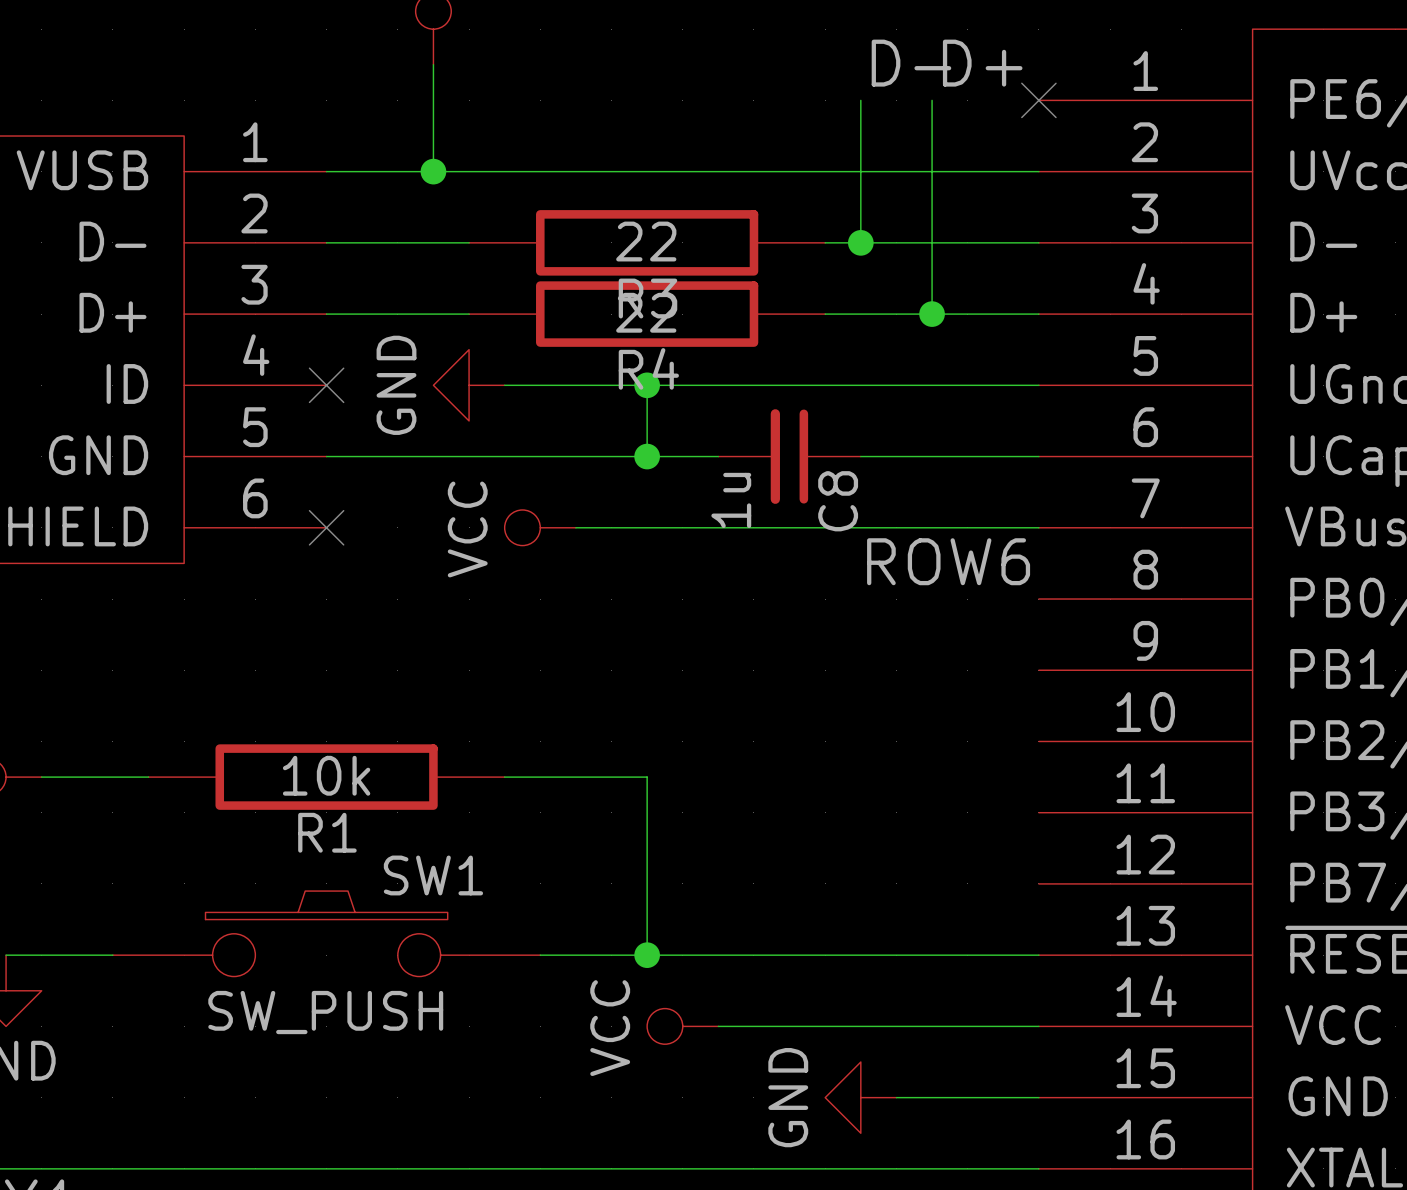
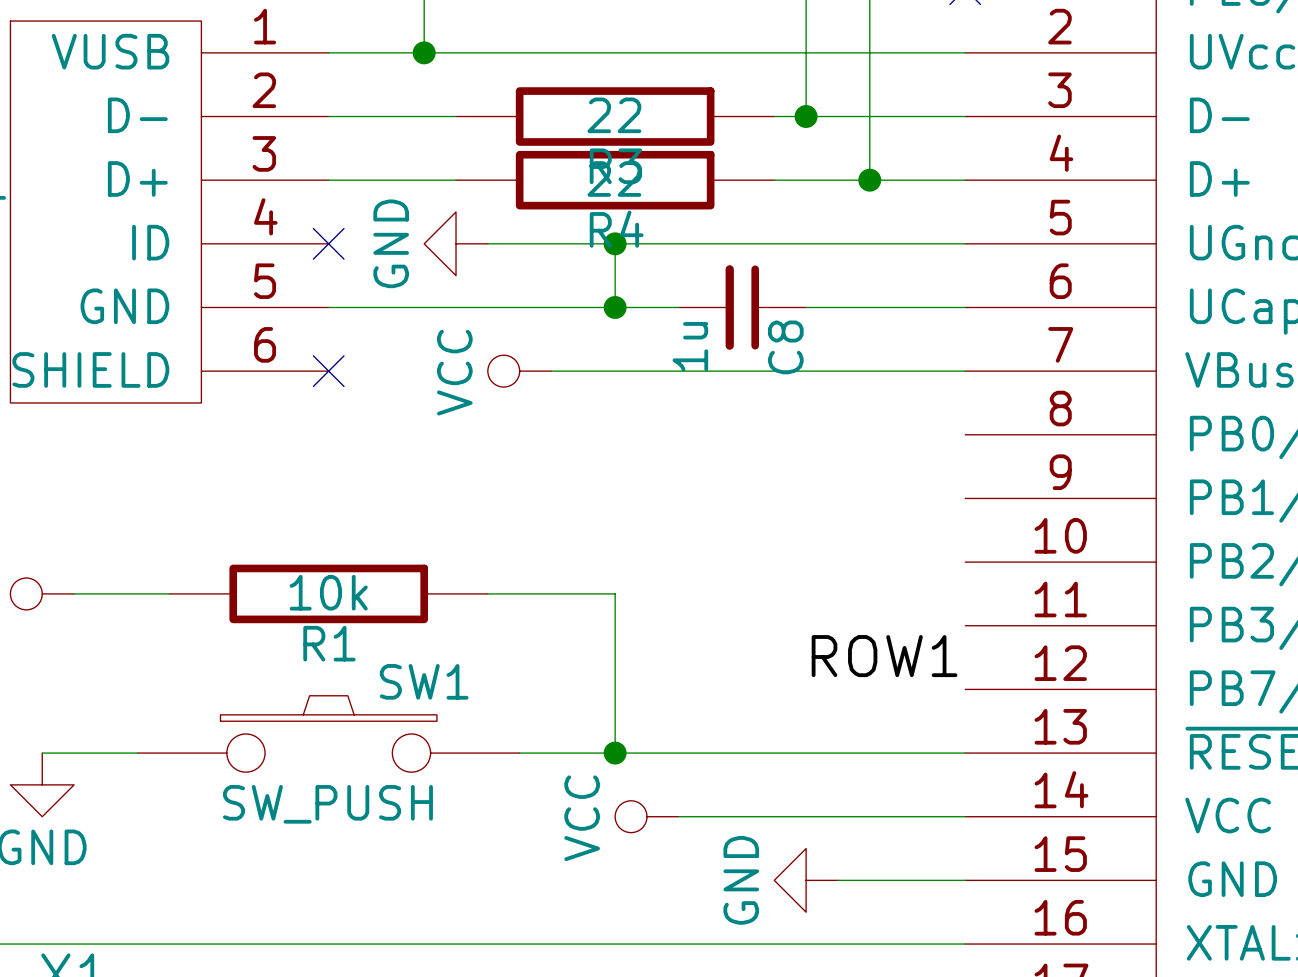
label: ROW6 (948, 561) -> none
label: none -> ROW1 (884, 656)

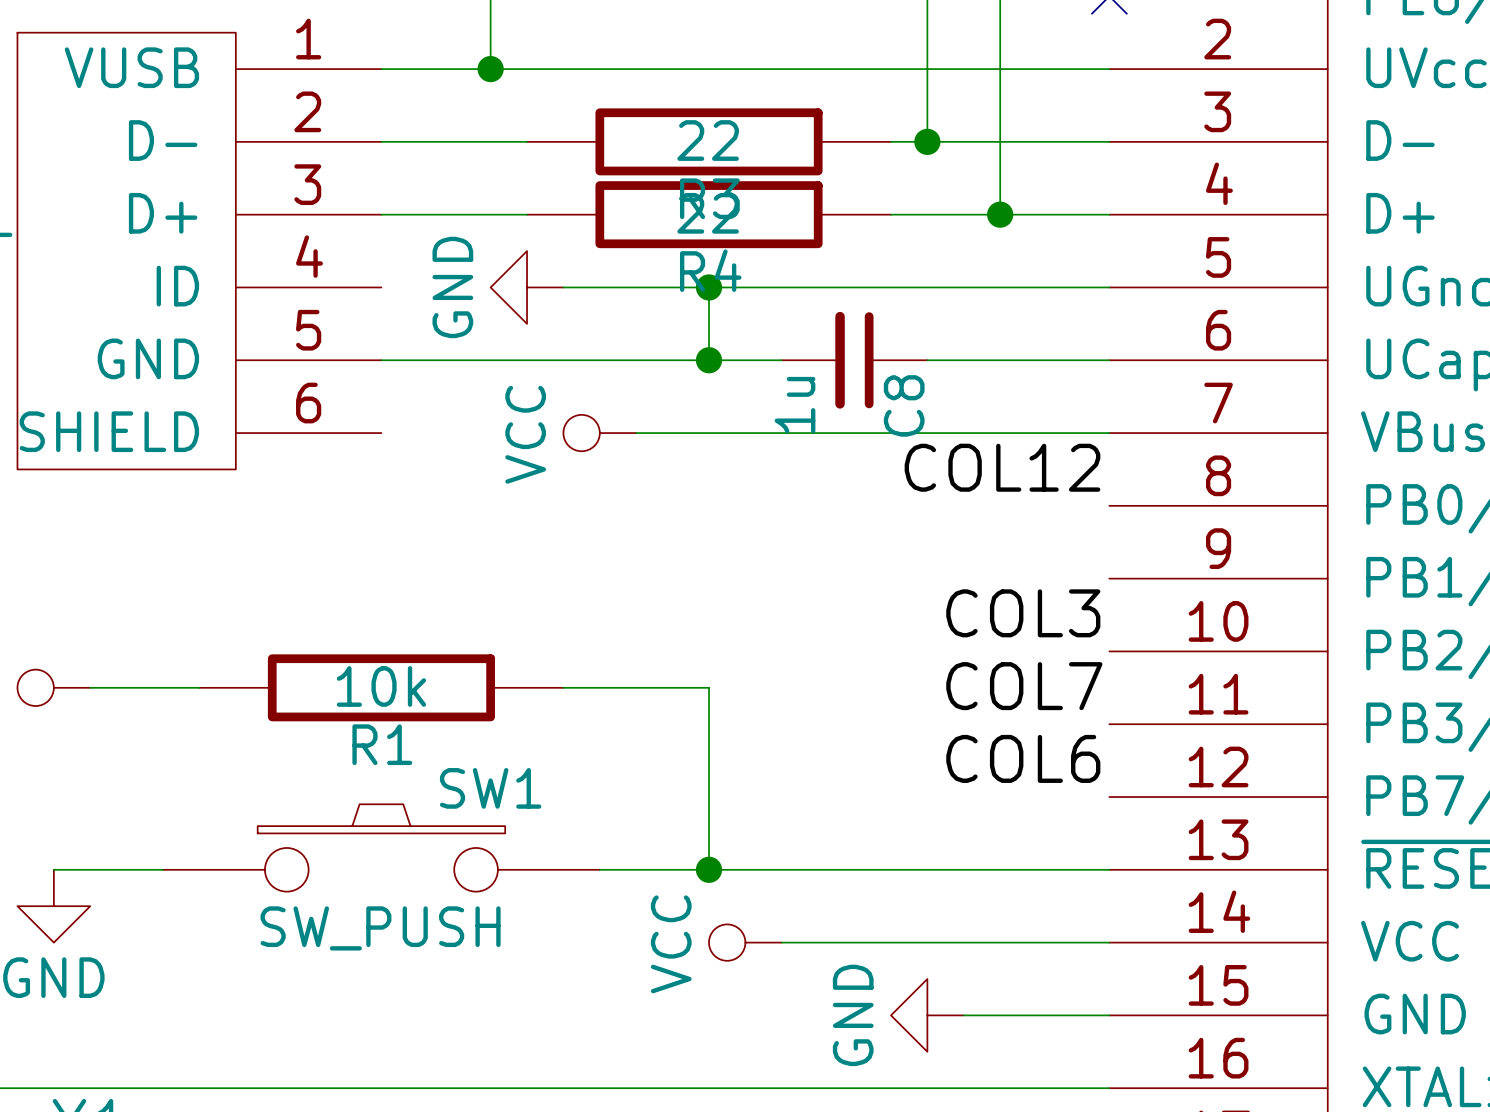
no-connect mark: (328, 243) -> none
no-connect mark: (328, 371) -> none
label: none -> COL12 (1002, 467)
label: none -> COL3 (1023, 613)
label: none -> COL7 (1024, 686)
label: ROW1 (884, 656) -> COL6 (1023, 758)

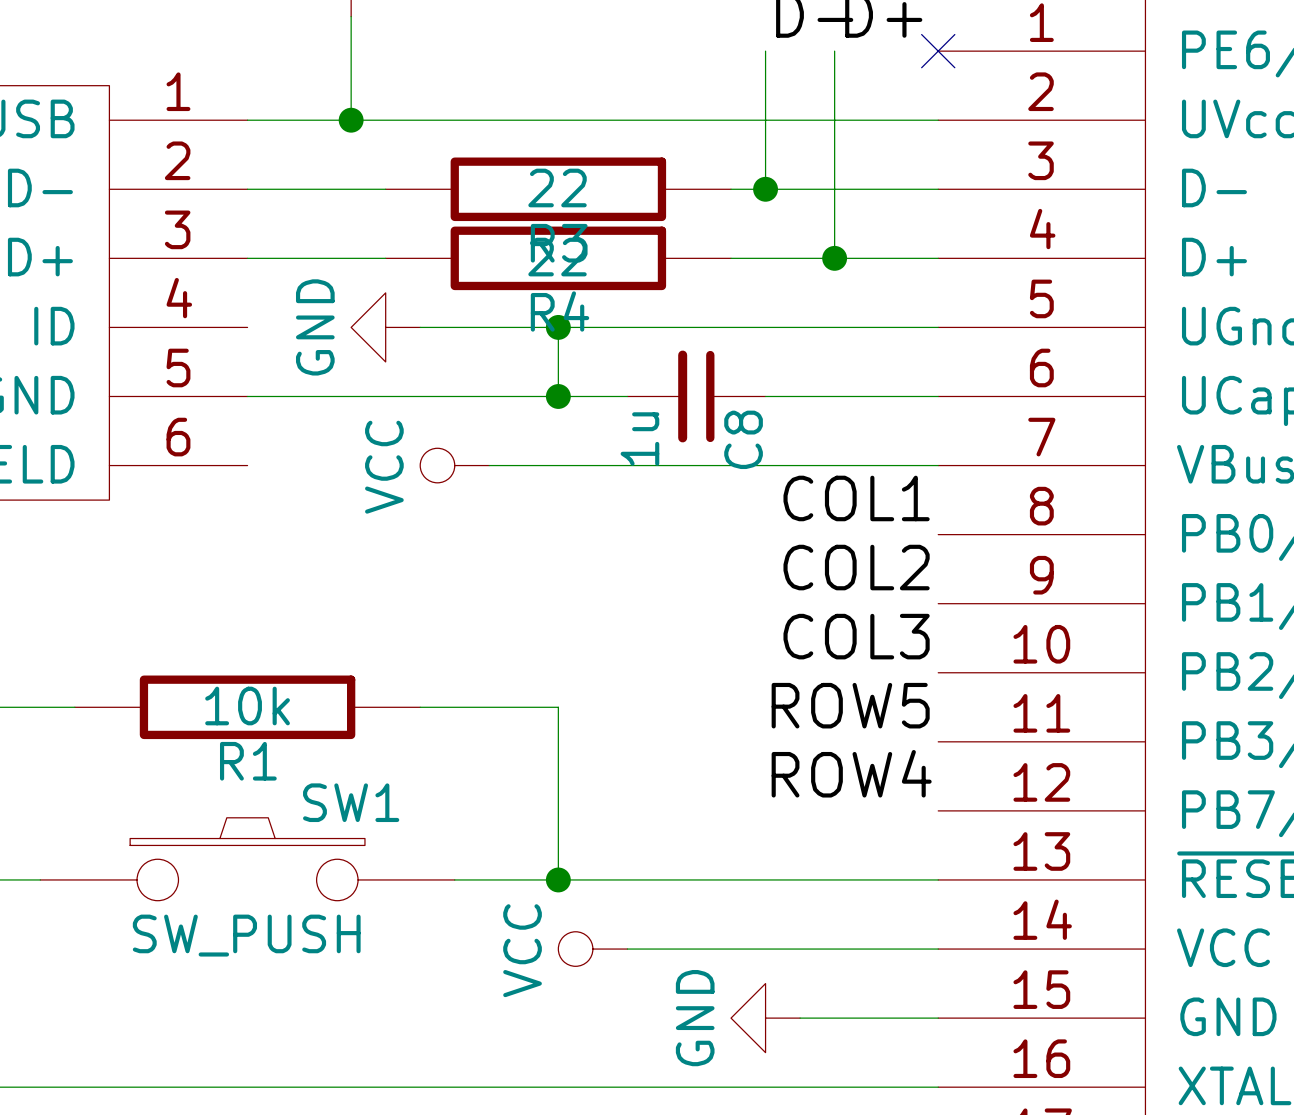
label: COL12 (1002, 467) -> COL1 (856, 498)
label: none -> COL2 (856, 567)
label: COL7 (1024, 686) -> ROW5 (850, 705)
label: COL6 (1023, 758) -> ROW4 (851, 773)

